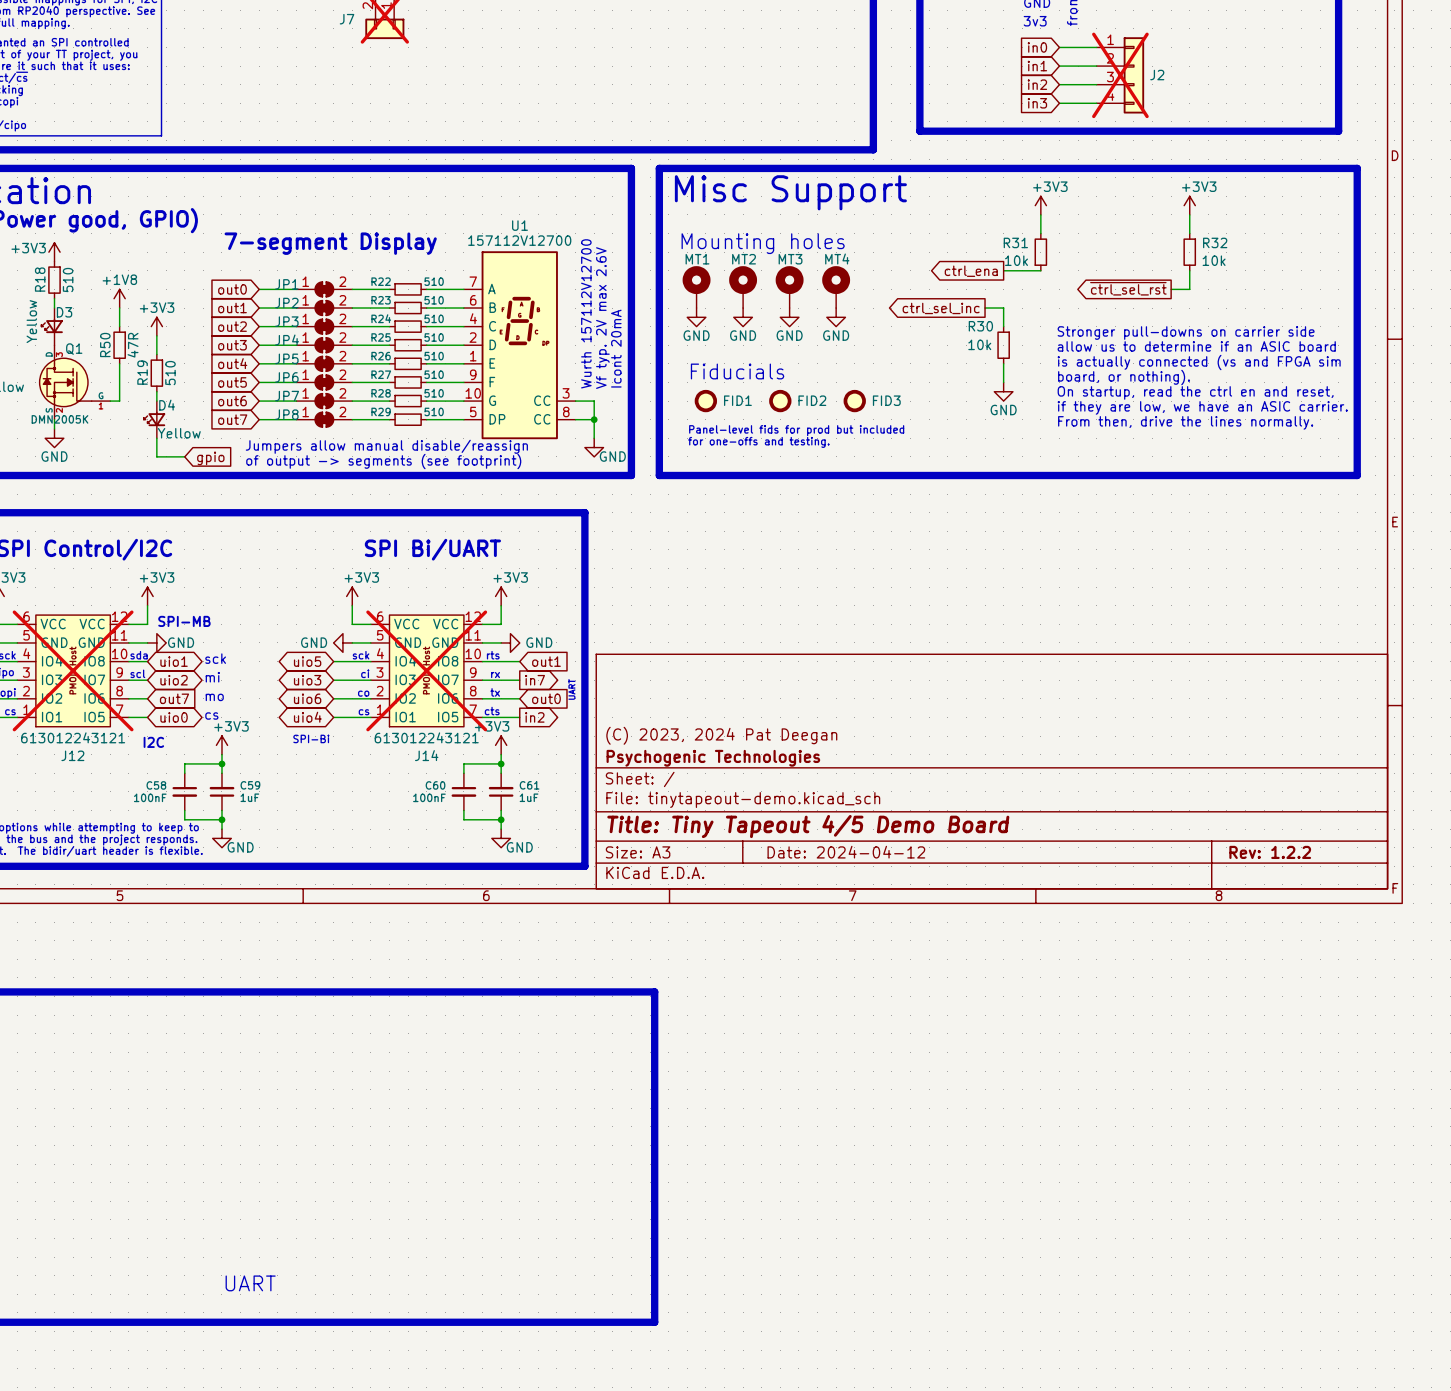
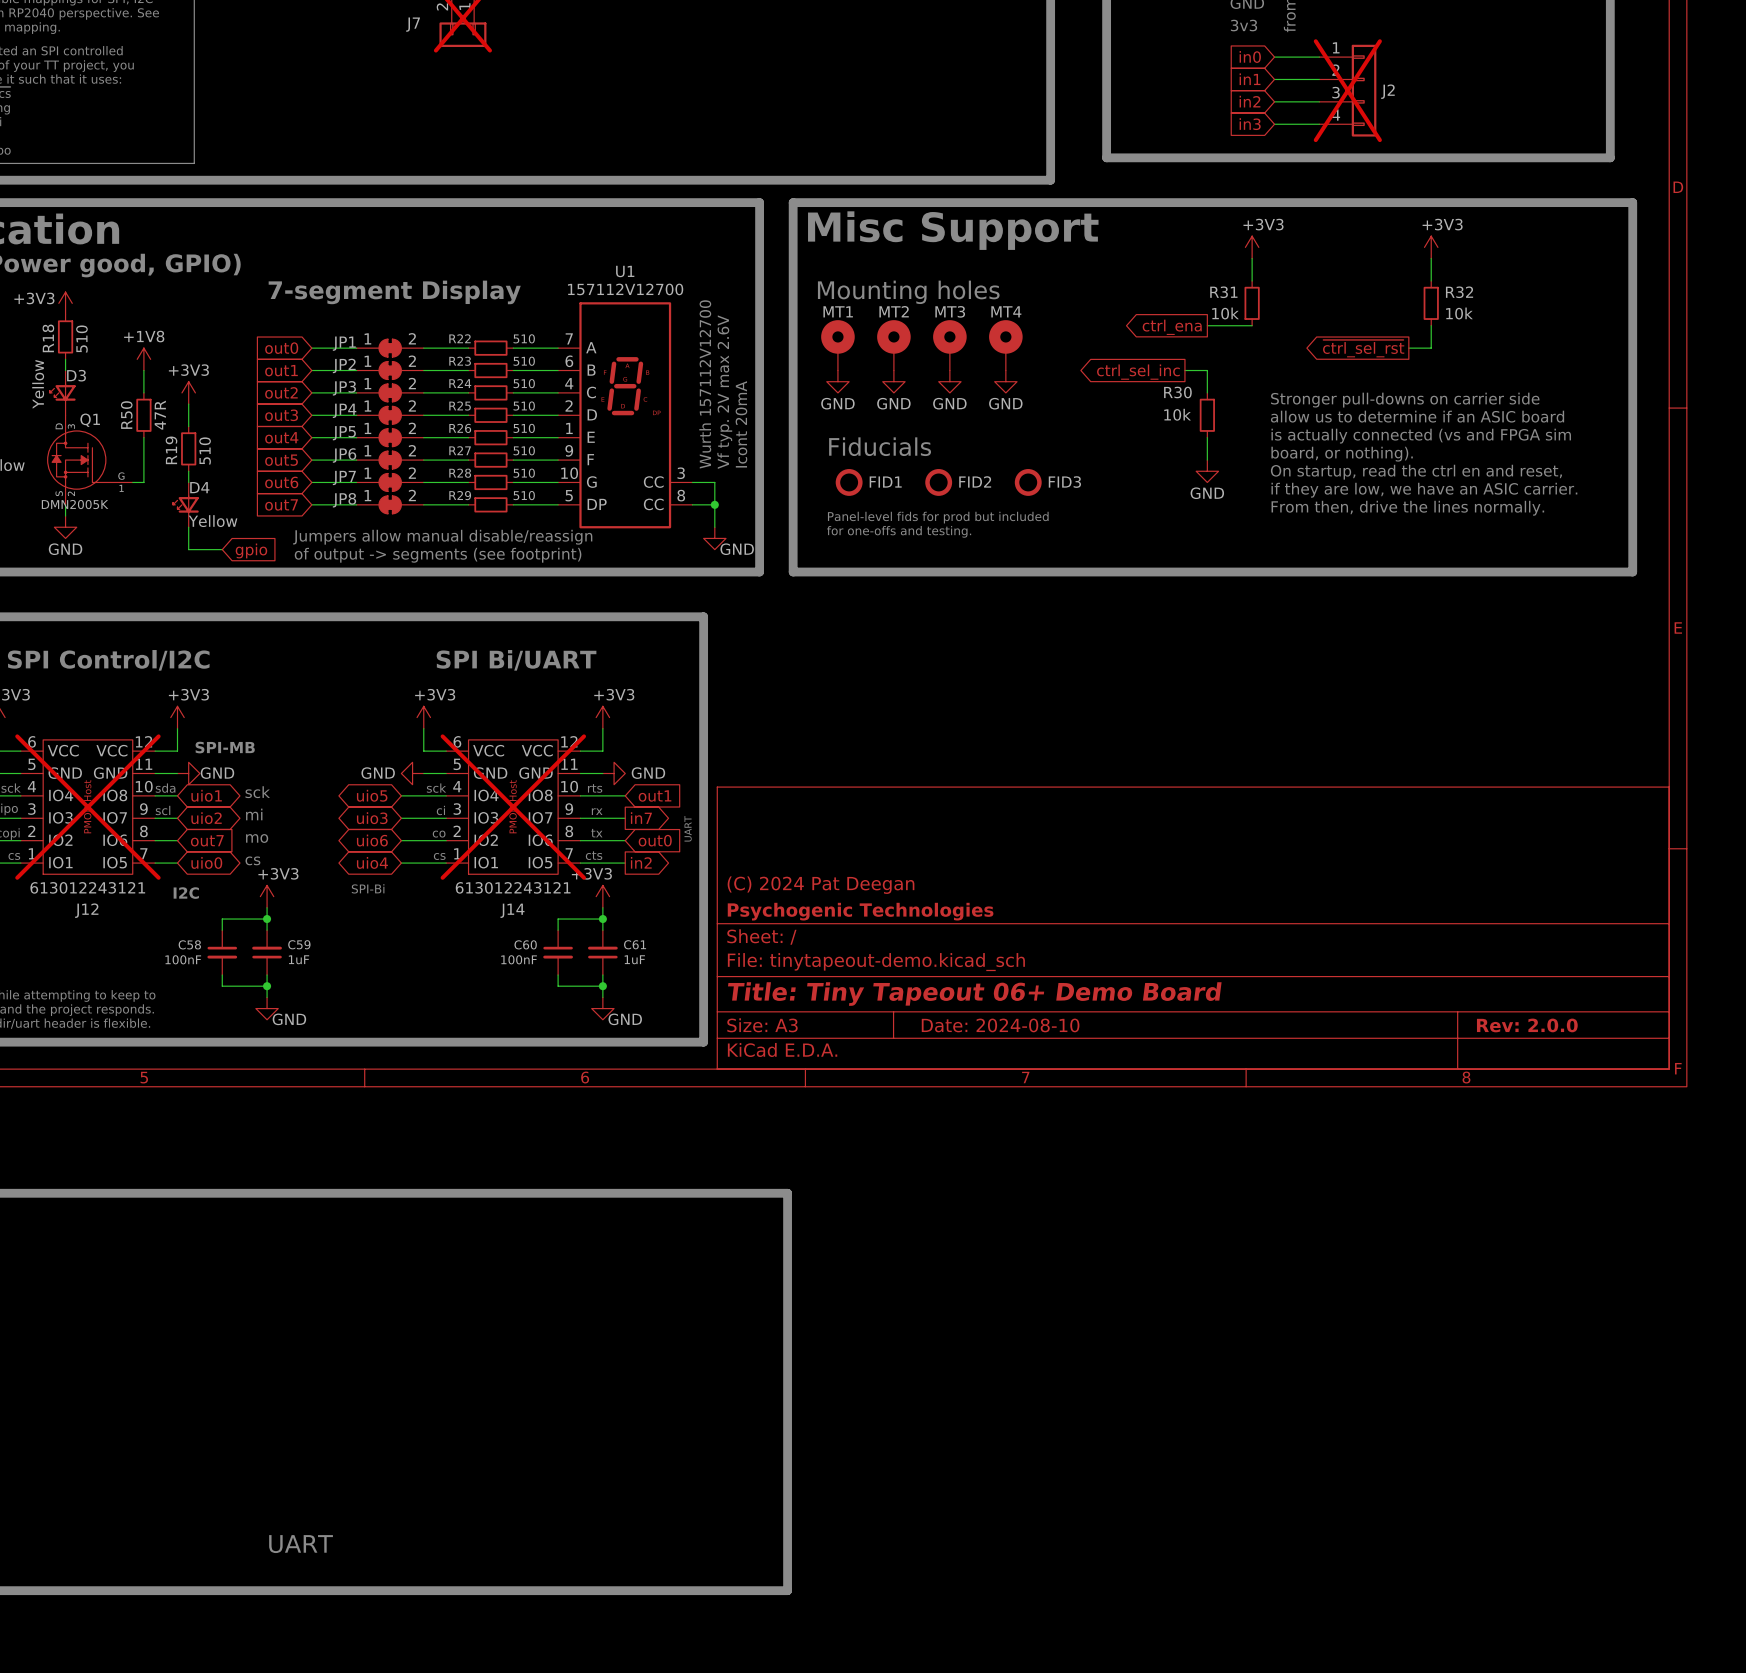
title block: (C) 2023, 2024 Pat Deegan (721, 735) -> (C) 2024 Pat Deegan (821, 885)
title block: Title: Tiny Tapeout 4/5 Demo Board (808, 826) -> Title: Tiny Tapeout 06+ Demo Board (974, 994)
title block: Date: 2024-04-12 (846, 852) -> Date: 2024-08-10 (1000, 1025)
title block: Rev: 1.2.2 (1270, 852) -> Rev: 2.0.0 (1527, 1025)

